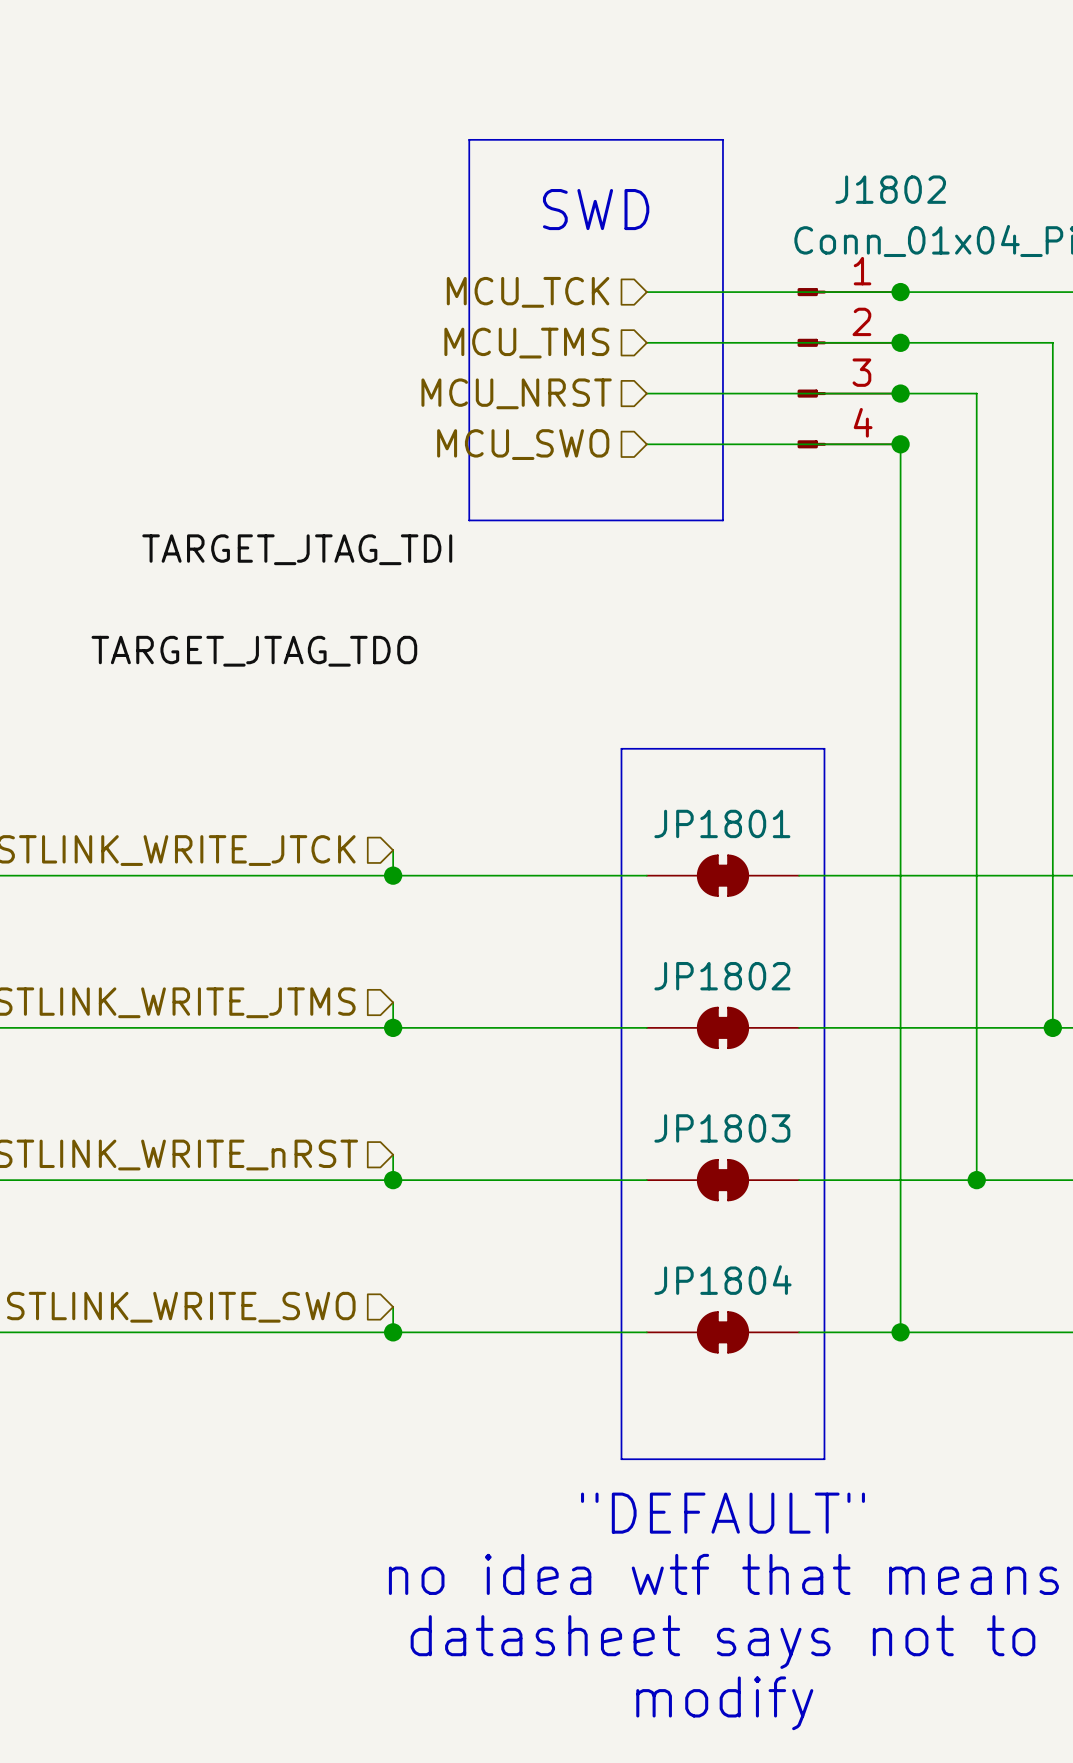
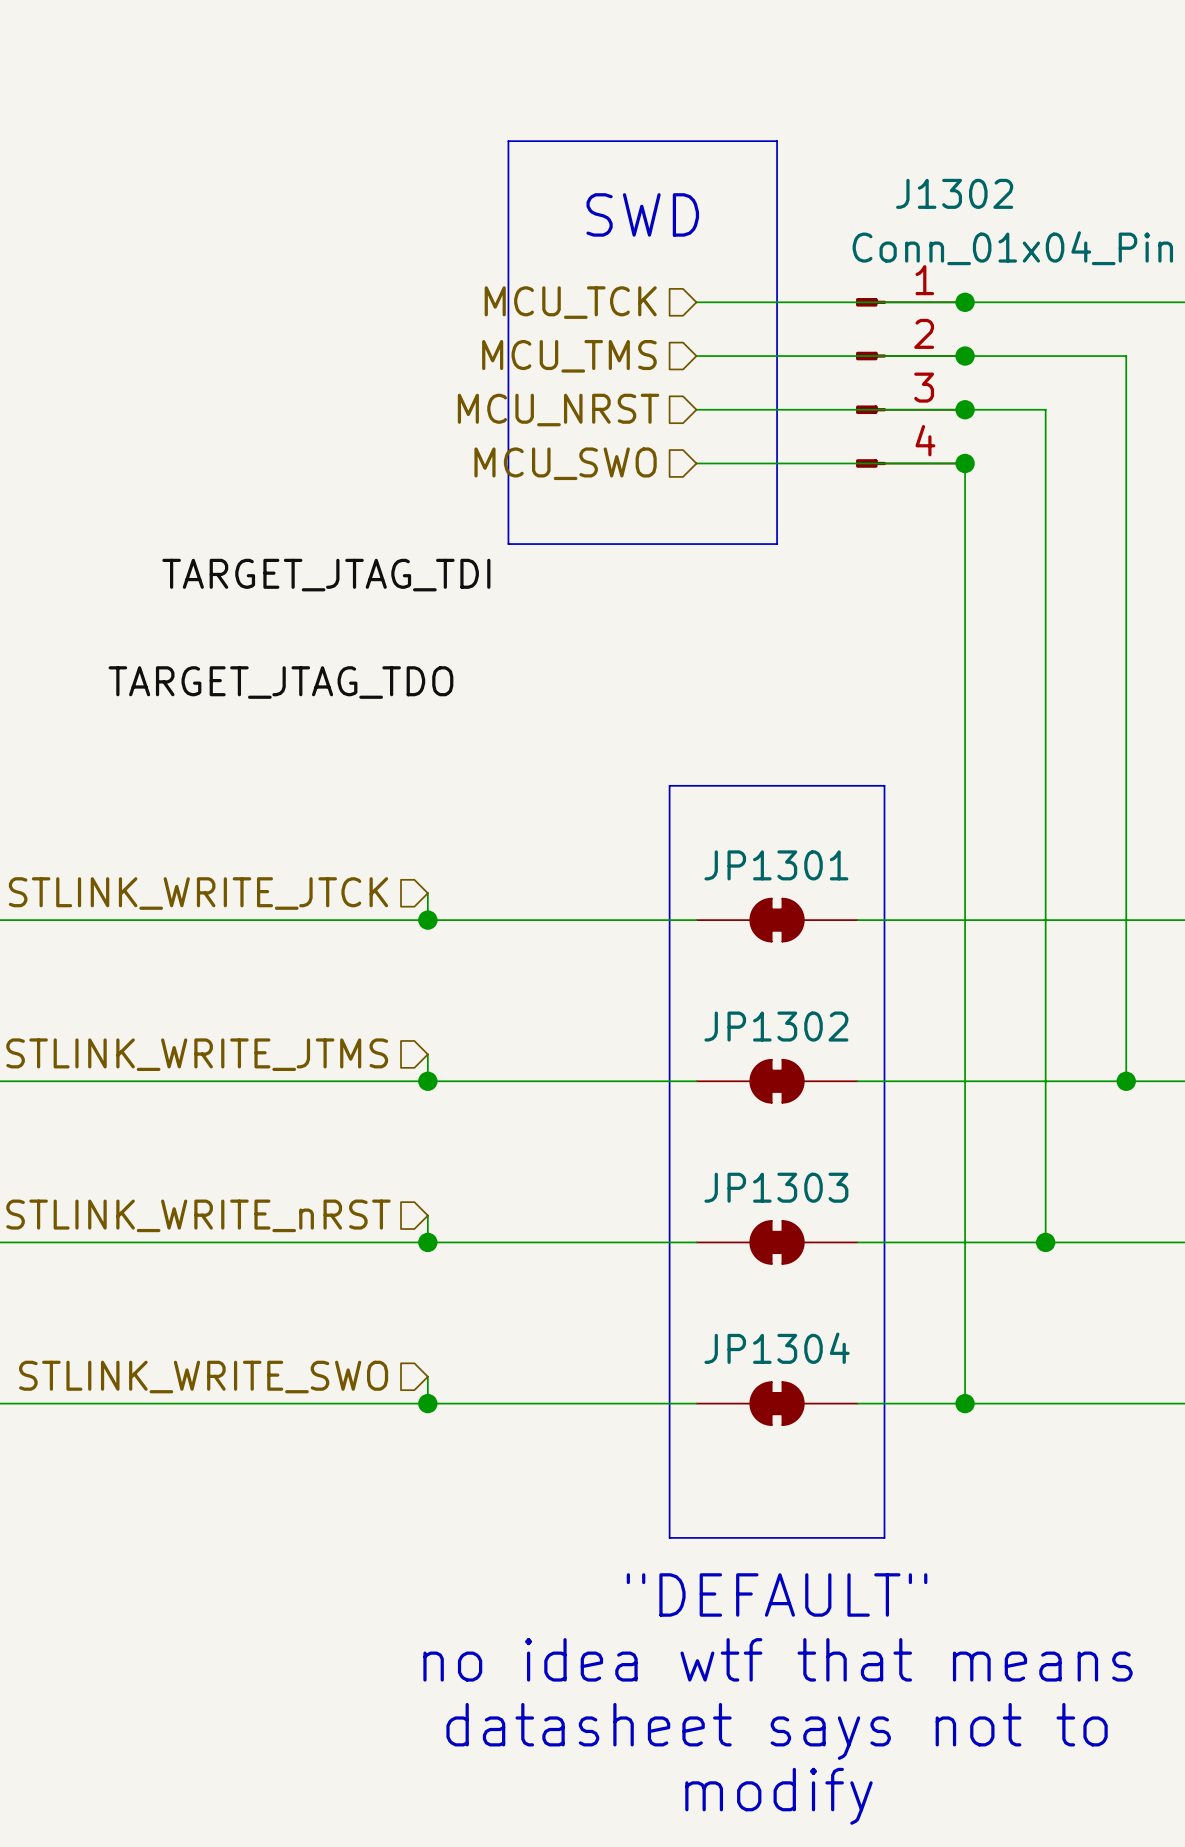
J1802 name: J1802 (890, 189) -> J1302 (954, 193)
JP1801 name: JP1801 (722, 823) -> JP1301 (776, 865)
JP1802 name: JP1802 (722, 976) -> JP1302 (776, 1026)
JP1803 name: JP1803 (722, 1128) -> JP1303 (776, 1187)
JP1804 name: JP1804 (722, 1280) -> JP1304 (777, 1348)

